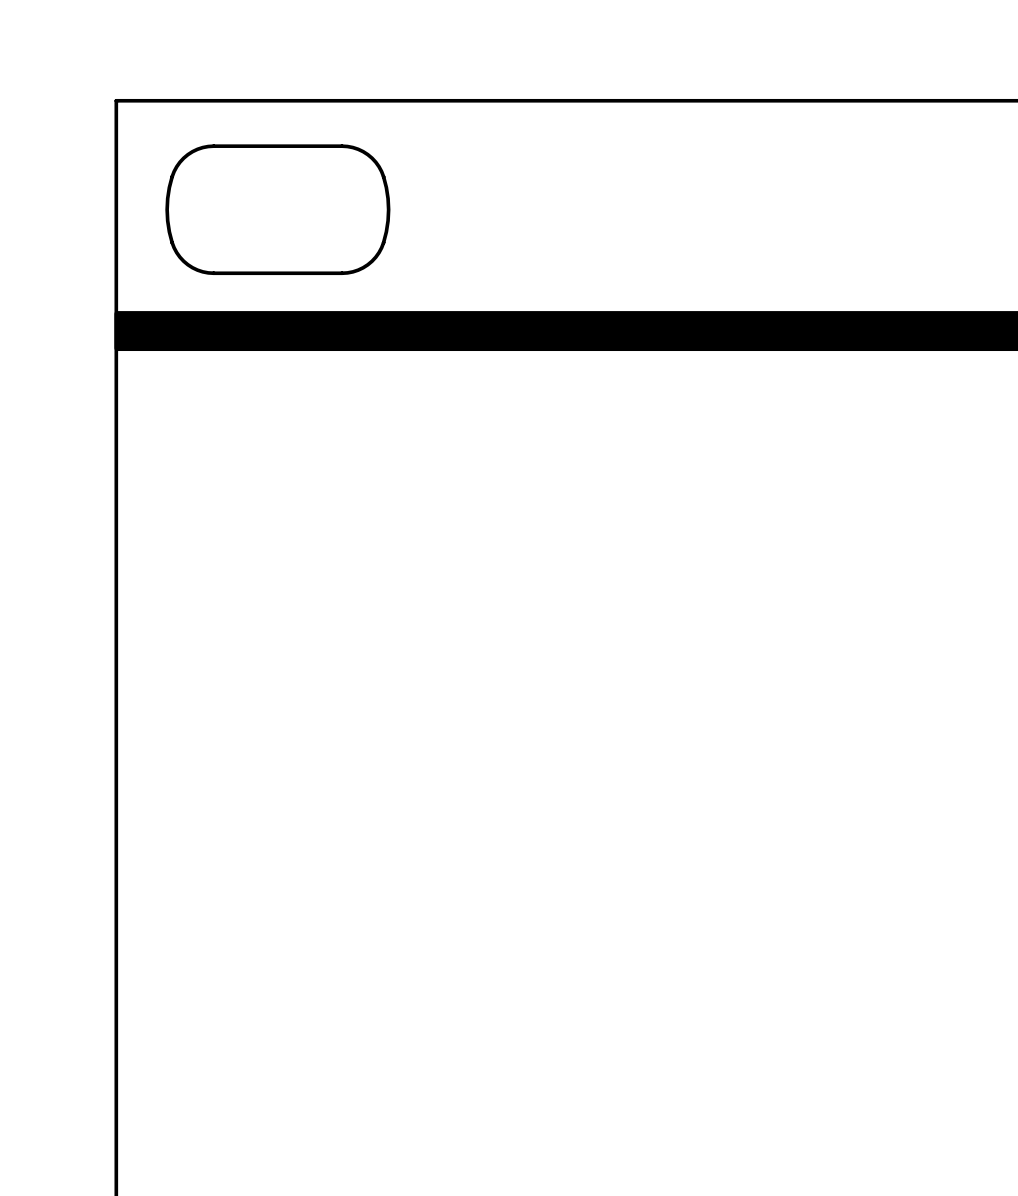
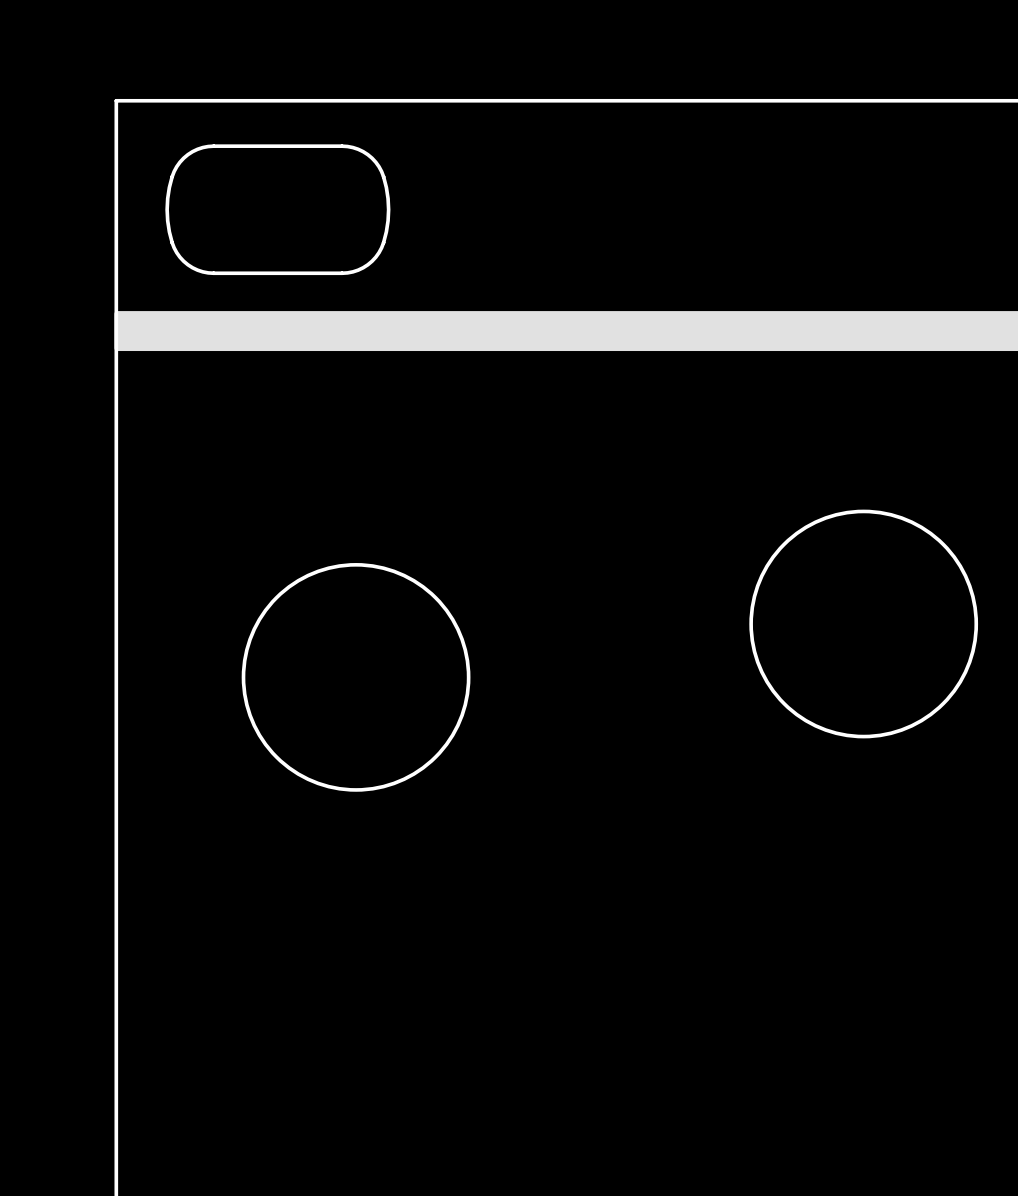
round board edge: none -> [749, 509, 979, 739]
round board edge: none -> [241, 563, 471, 792]

